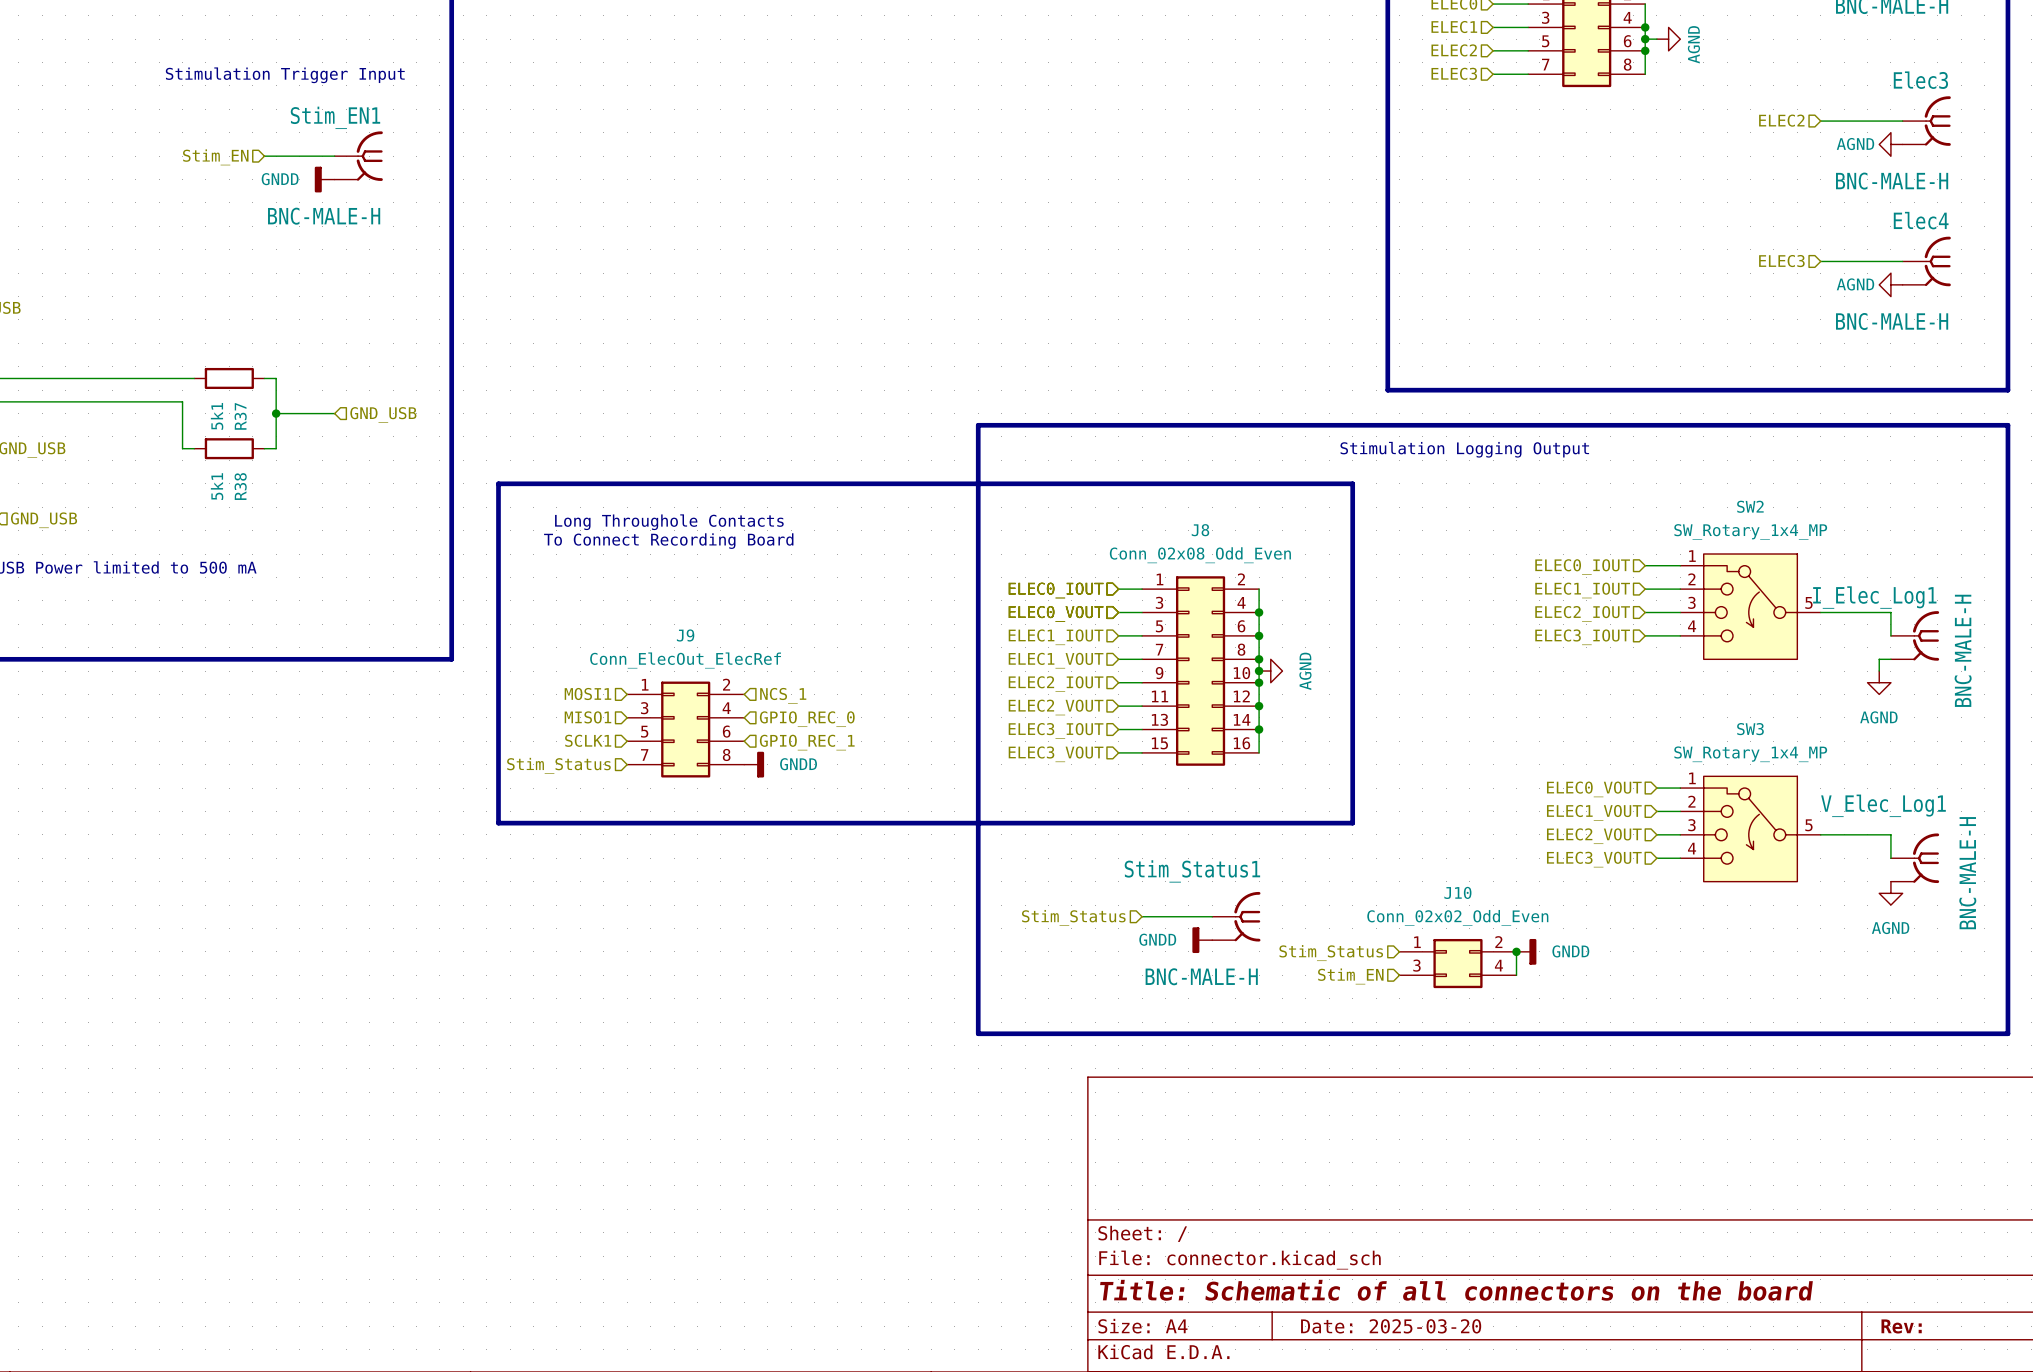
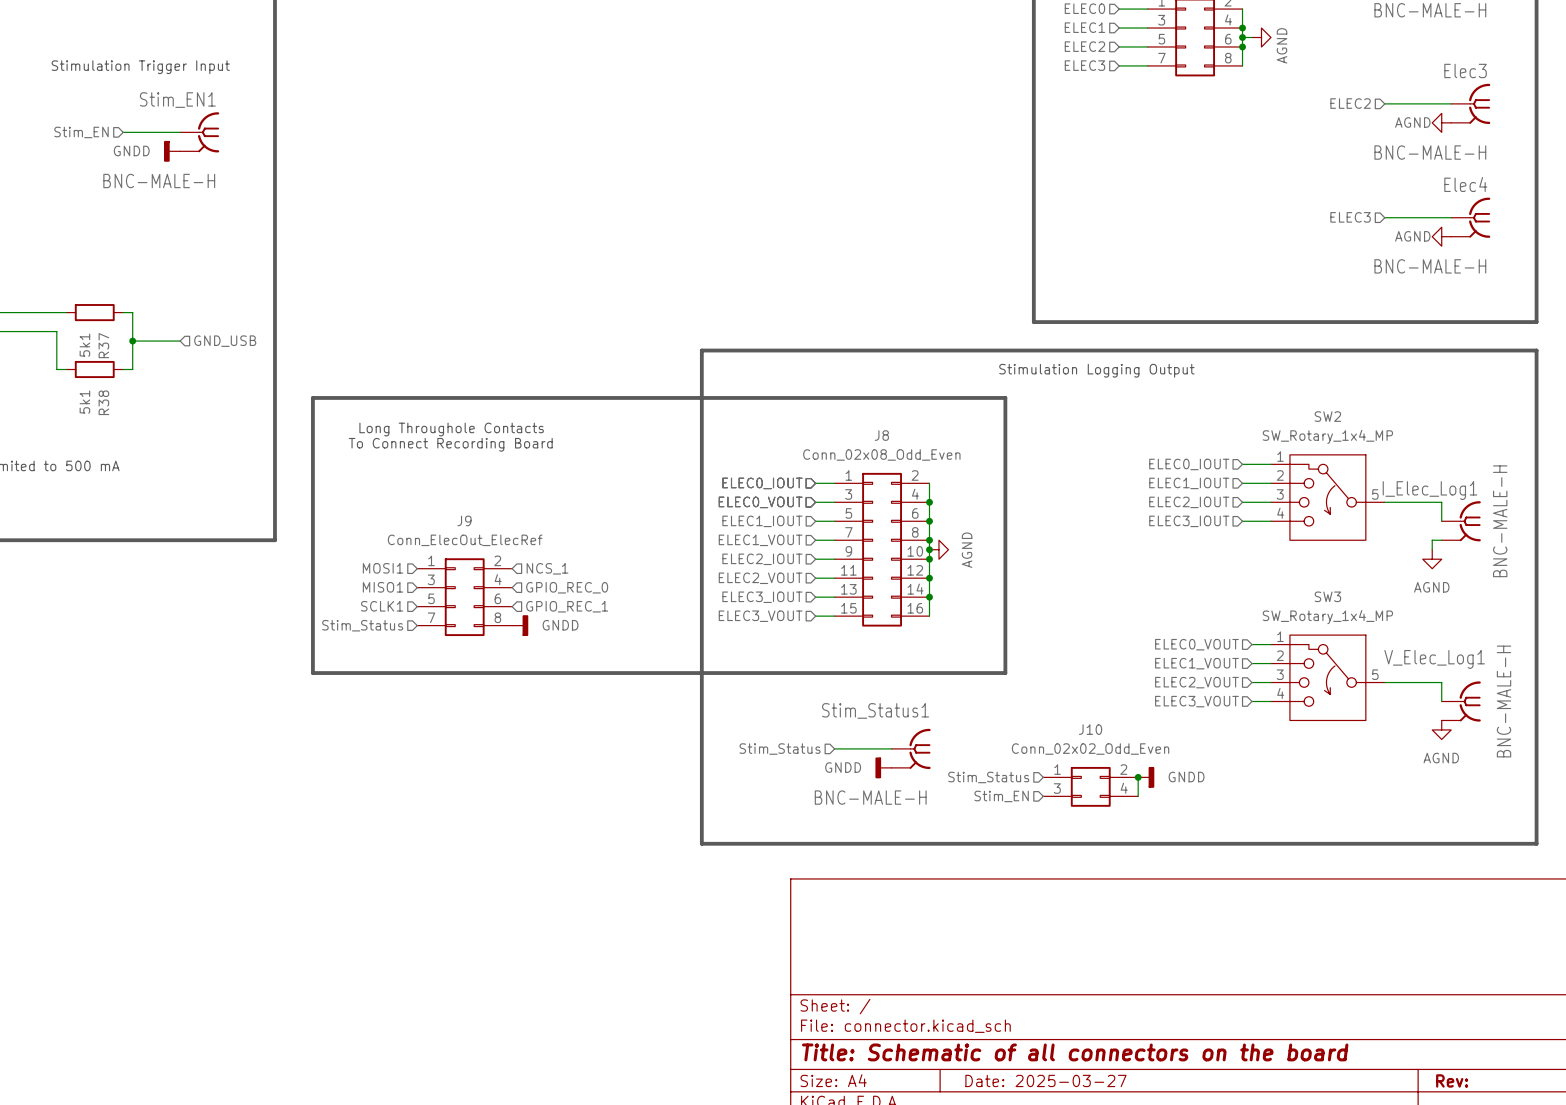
title block: Date: 2025-03-20 (1391, 1326) -> Date: 2025-03-27 (1045, 1080)

